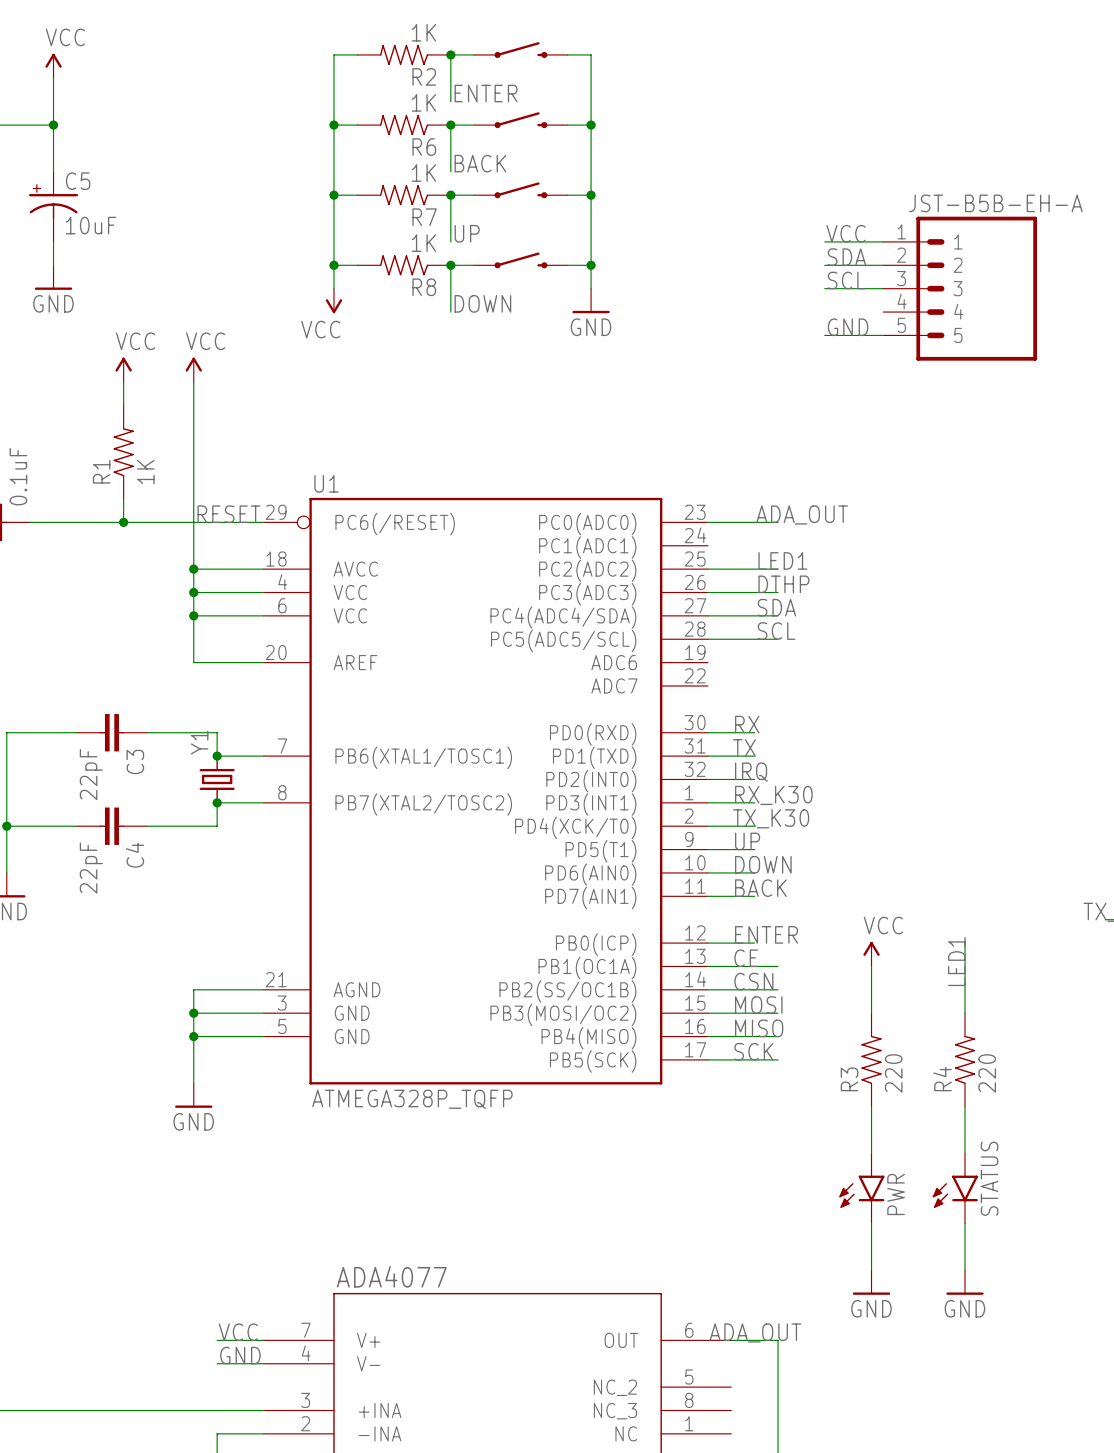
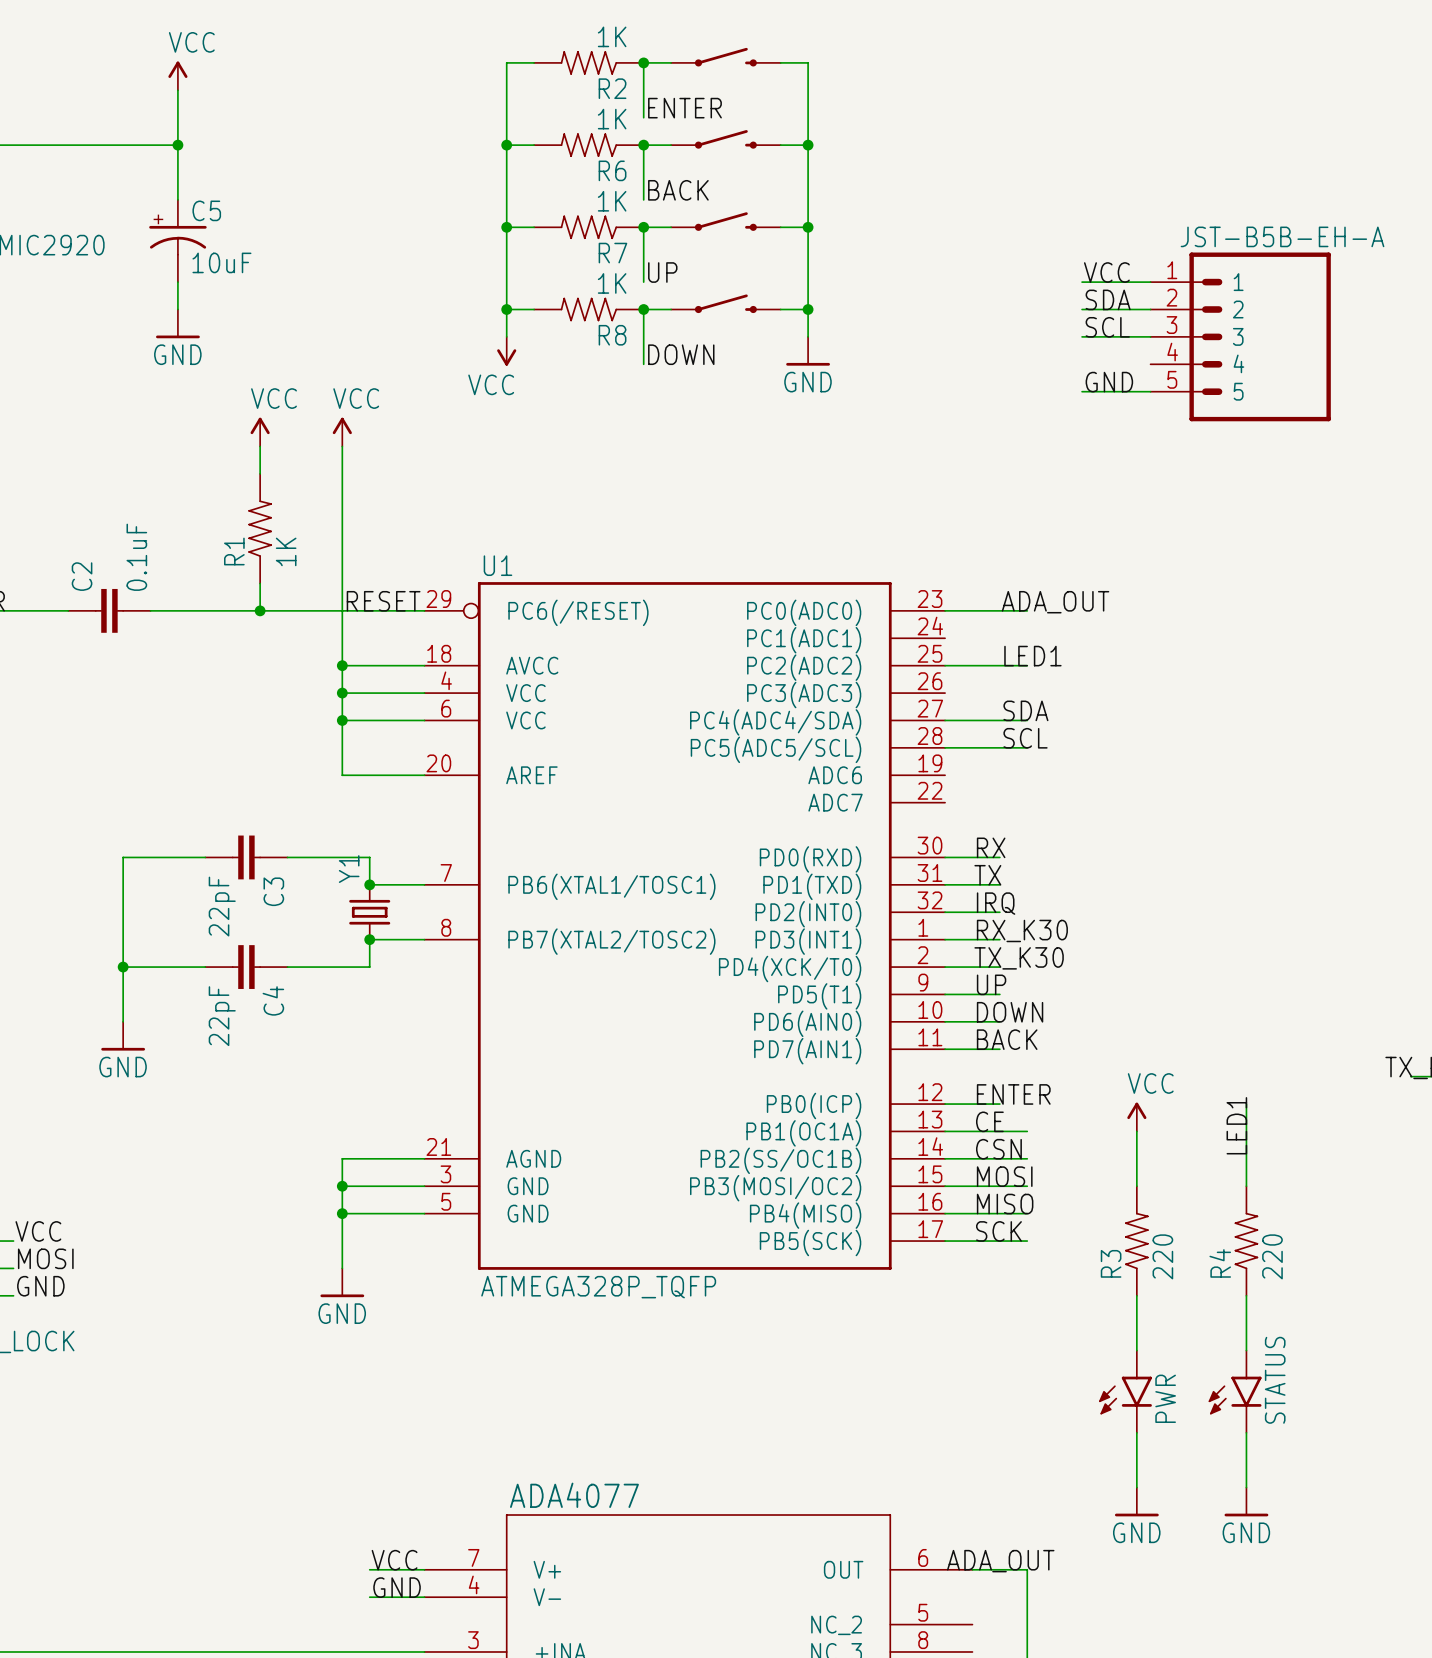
label: DTHP (783, 584) -> none
wire: (707, 592) (778, 592) -> none

